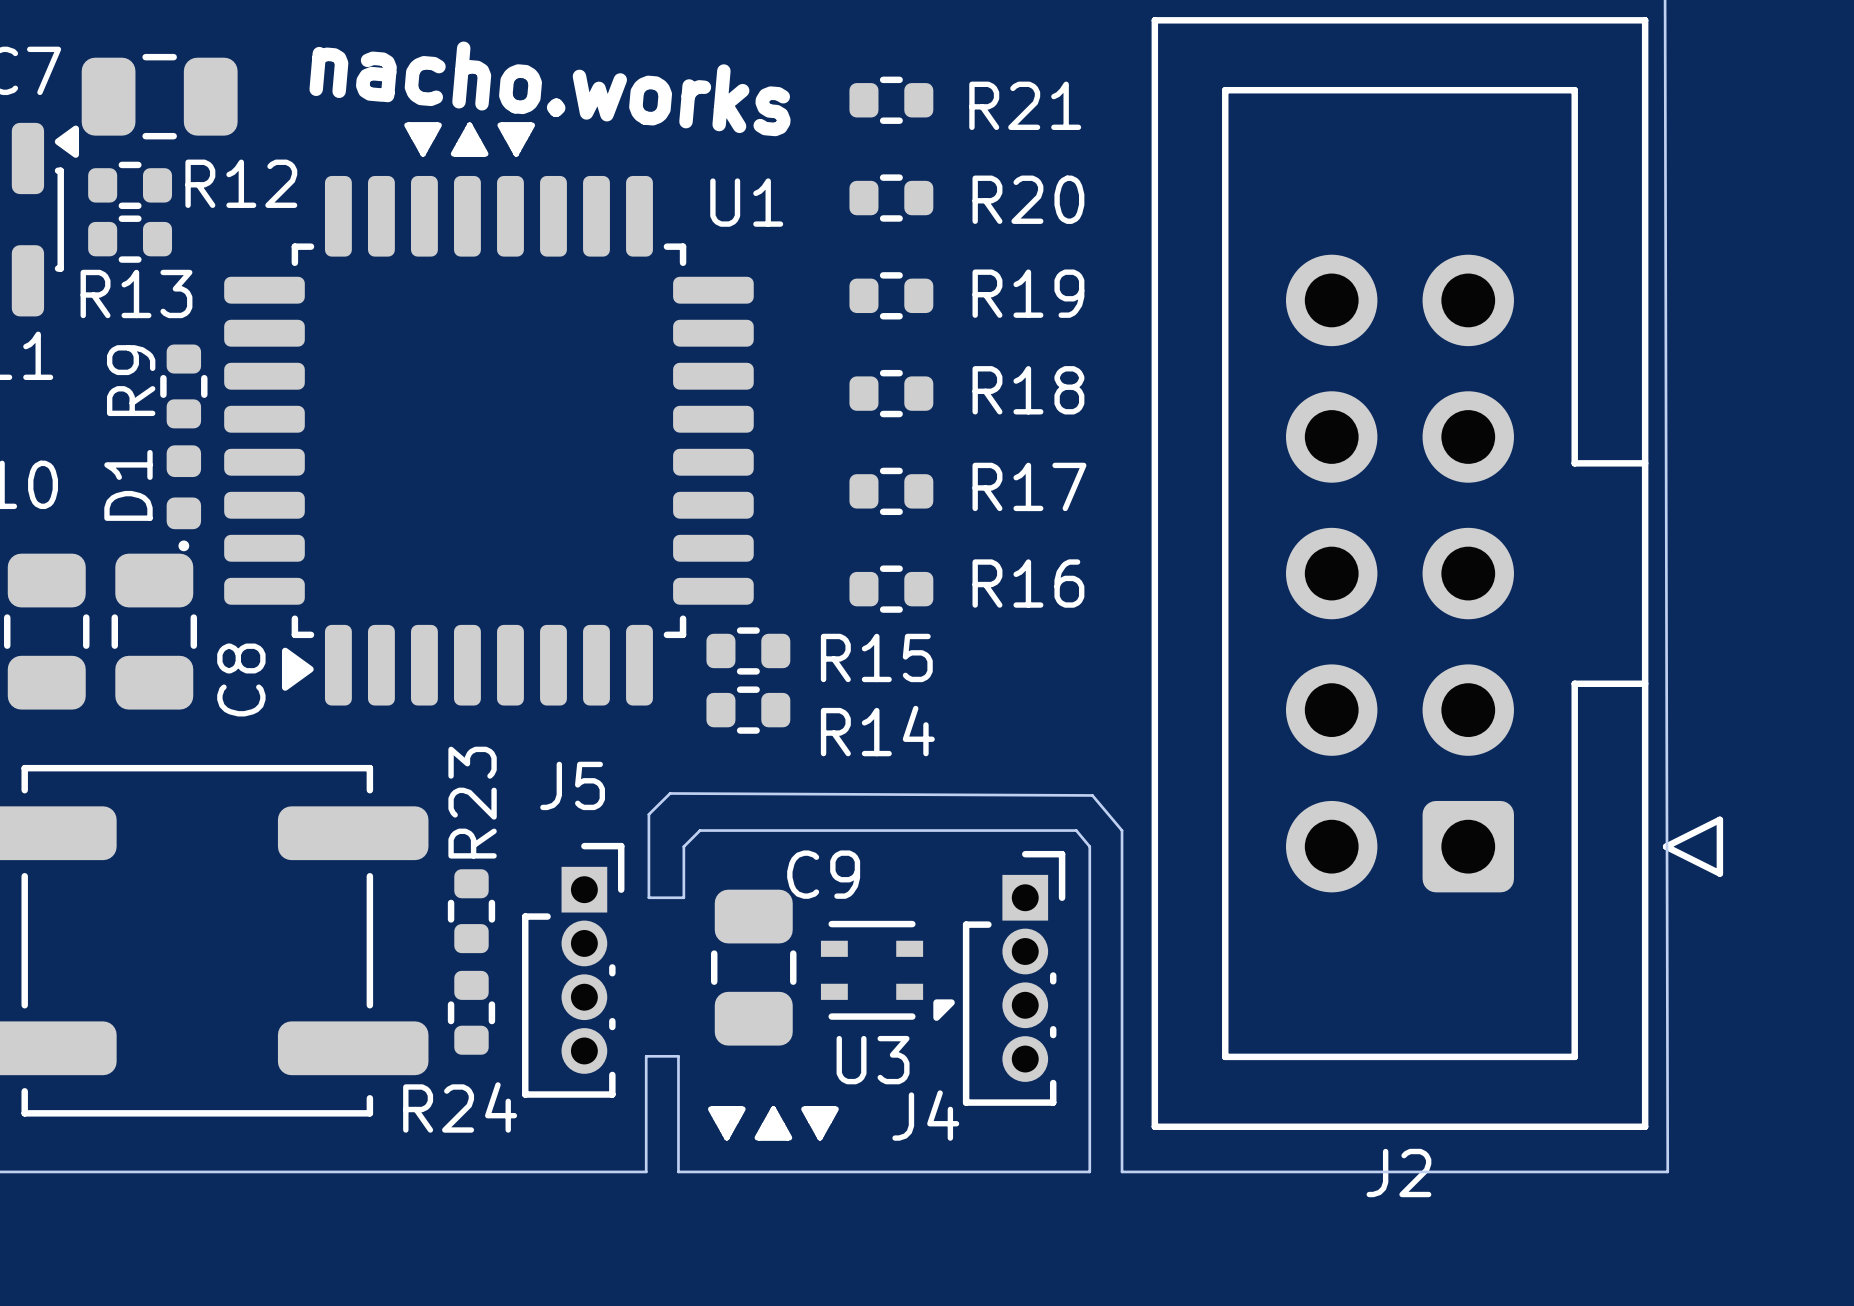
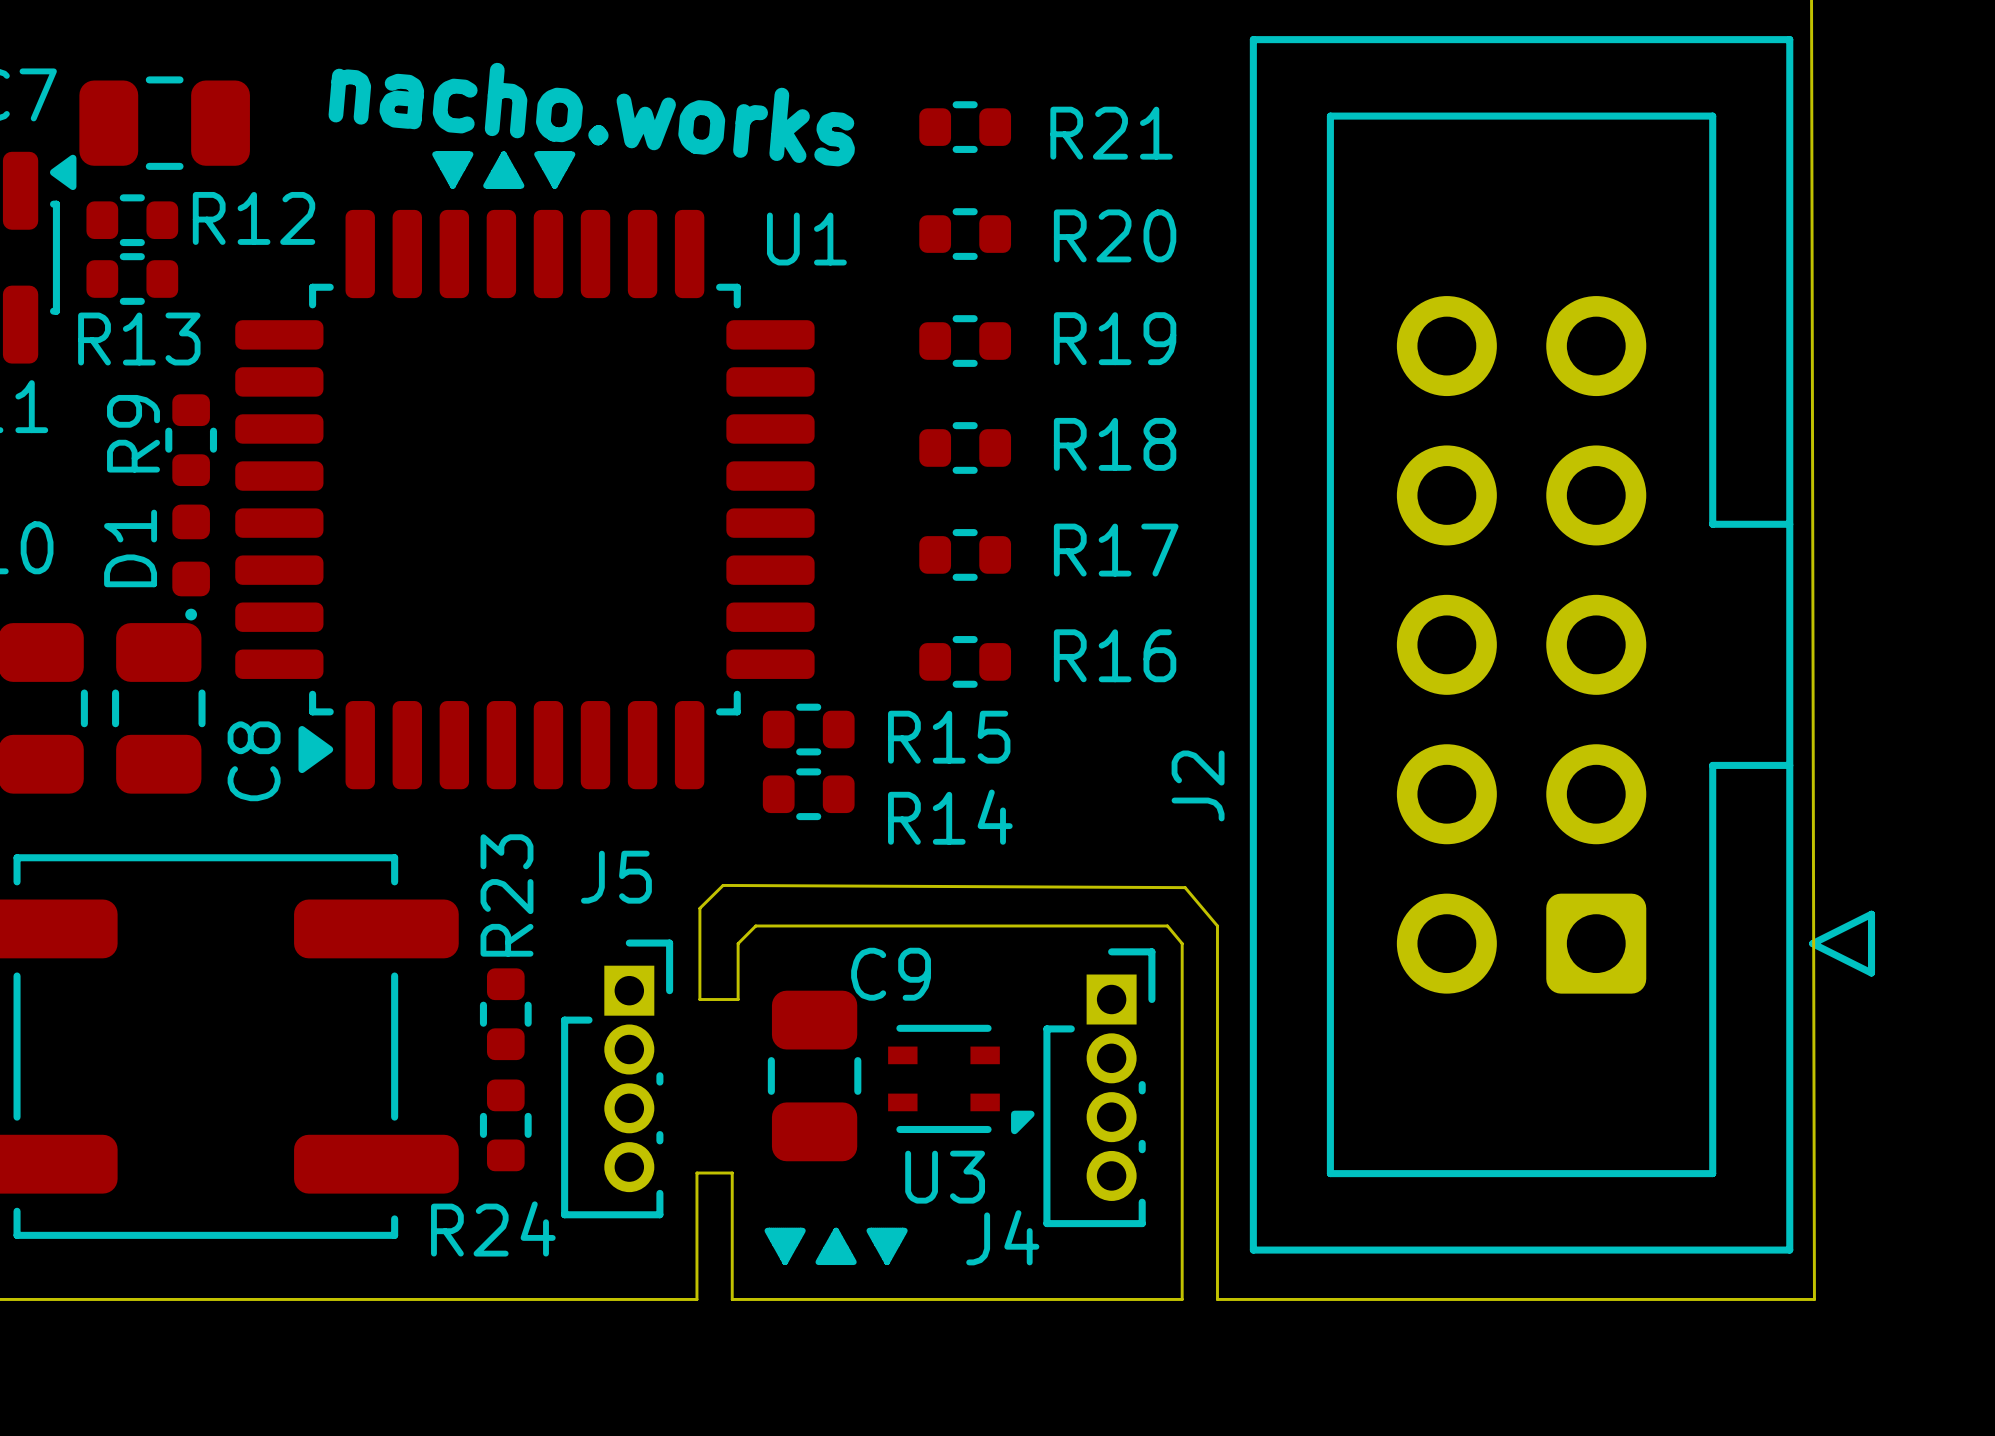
J2 name rotation: 0° (1398, 1173) -> 90° counterclockwise (1198, 785)
J2 name position: J2 (1398, 1173) -> J2 (1198, 785)

